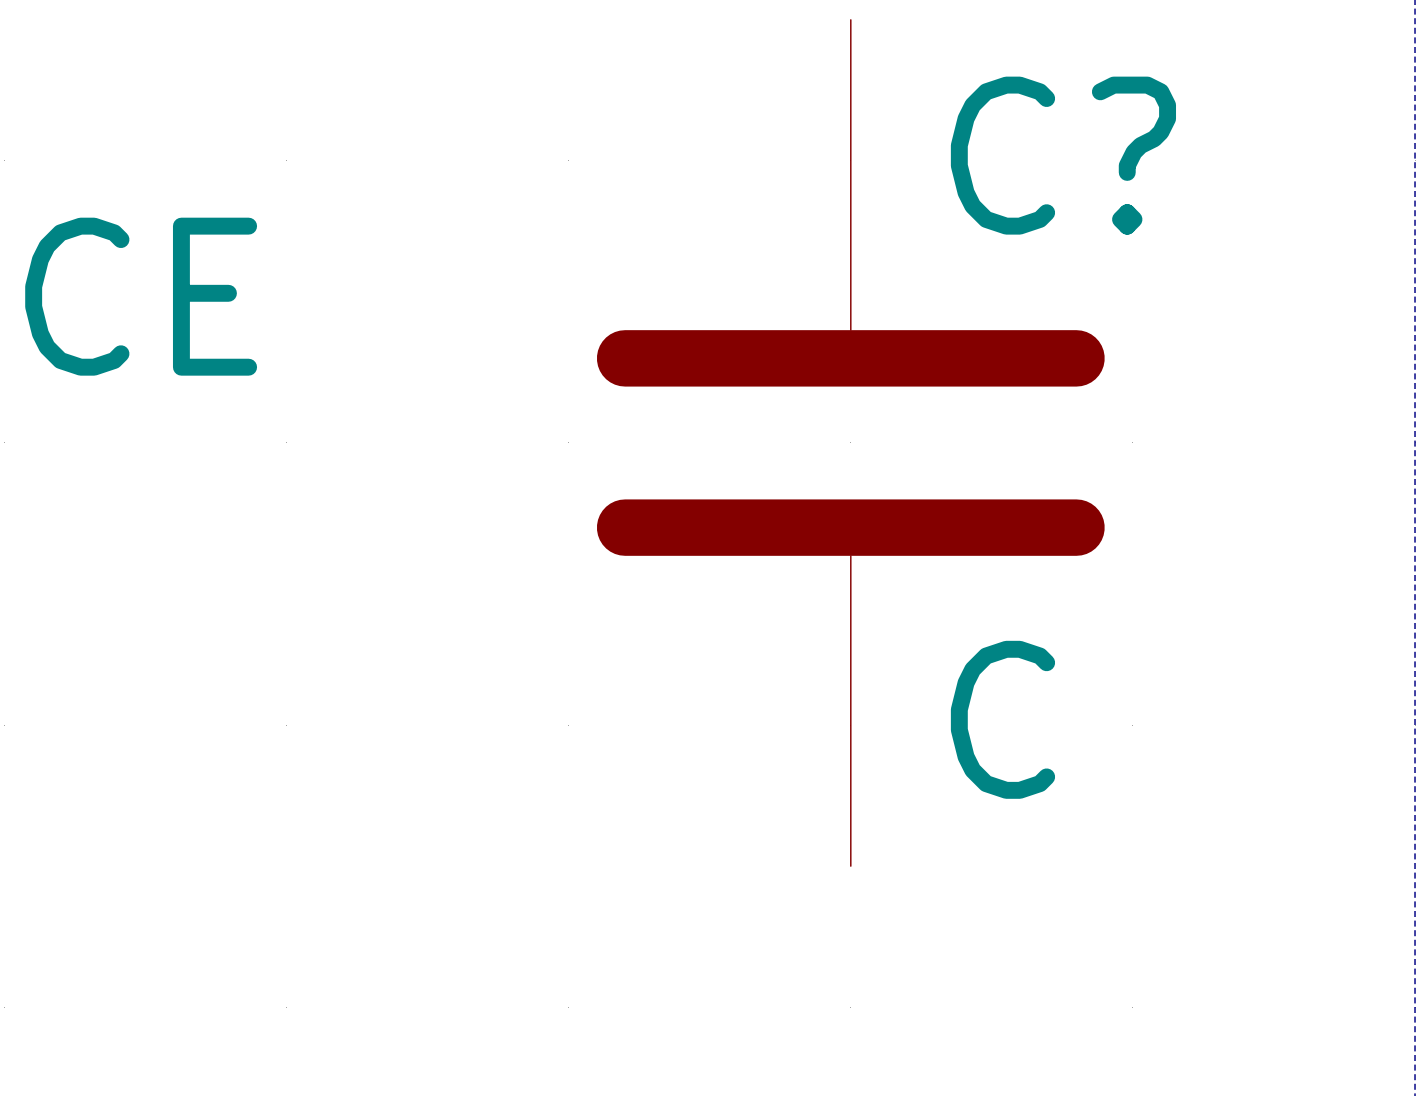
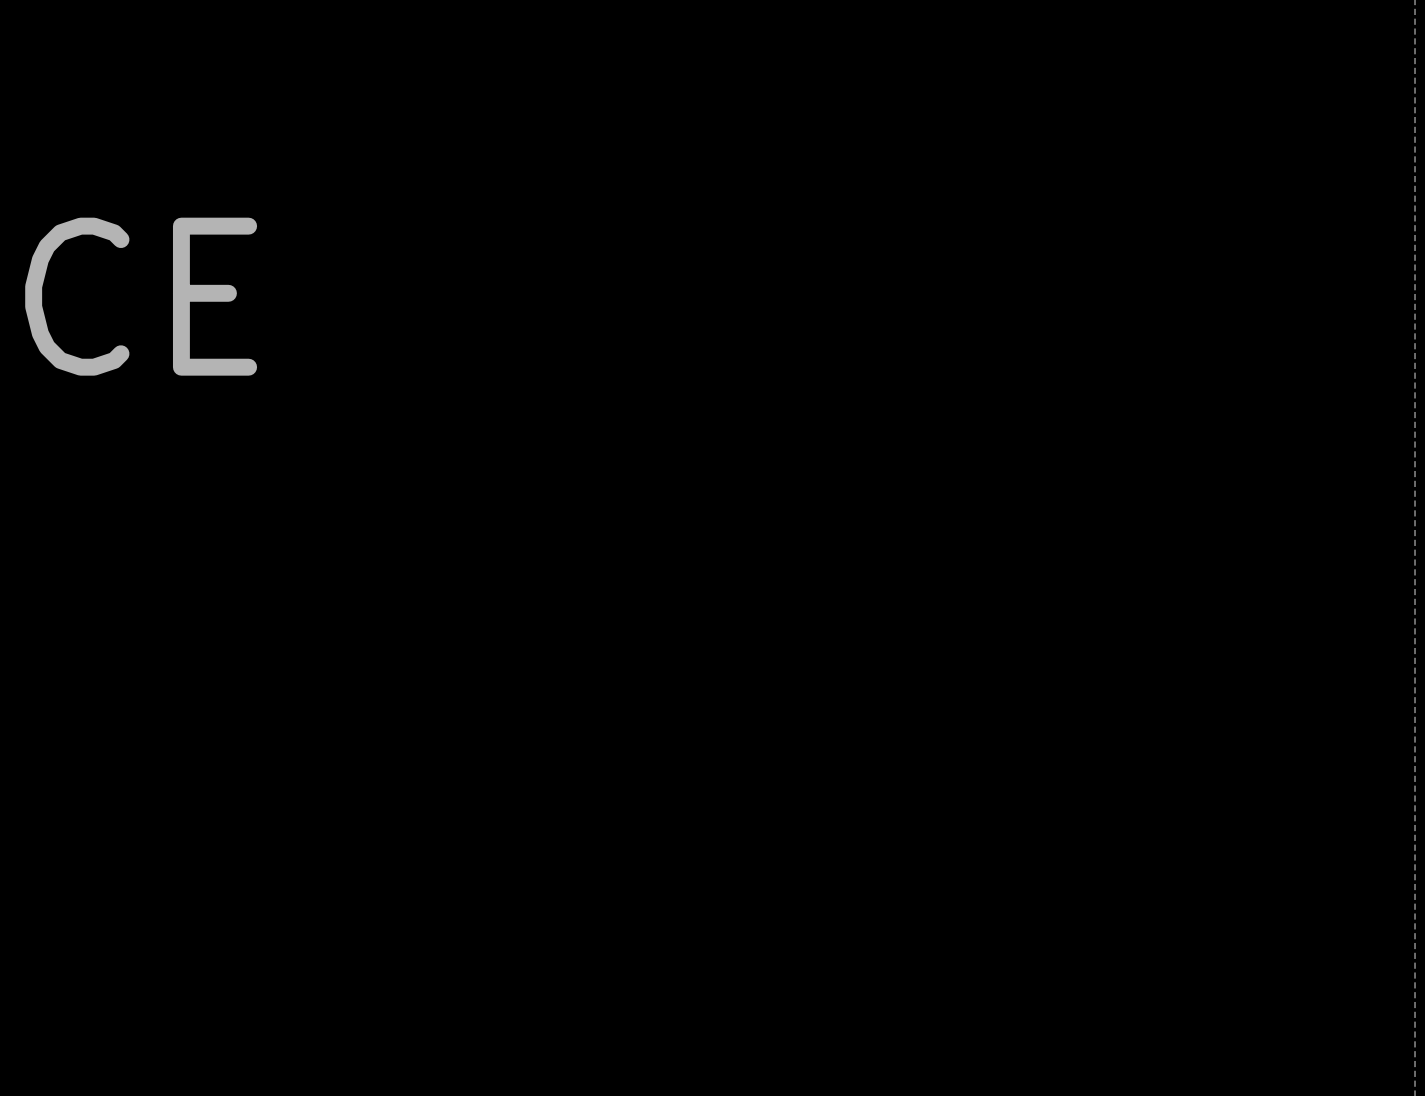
C?: C (850, 442) -> none

